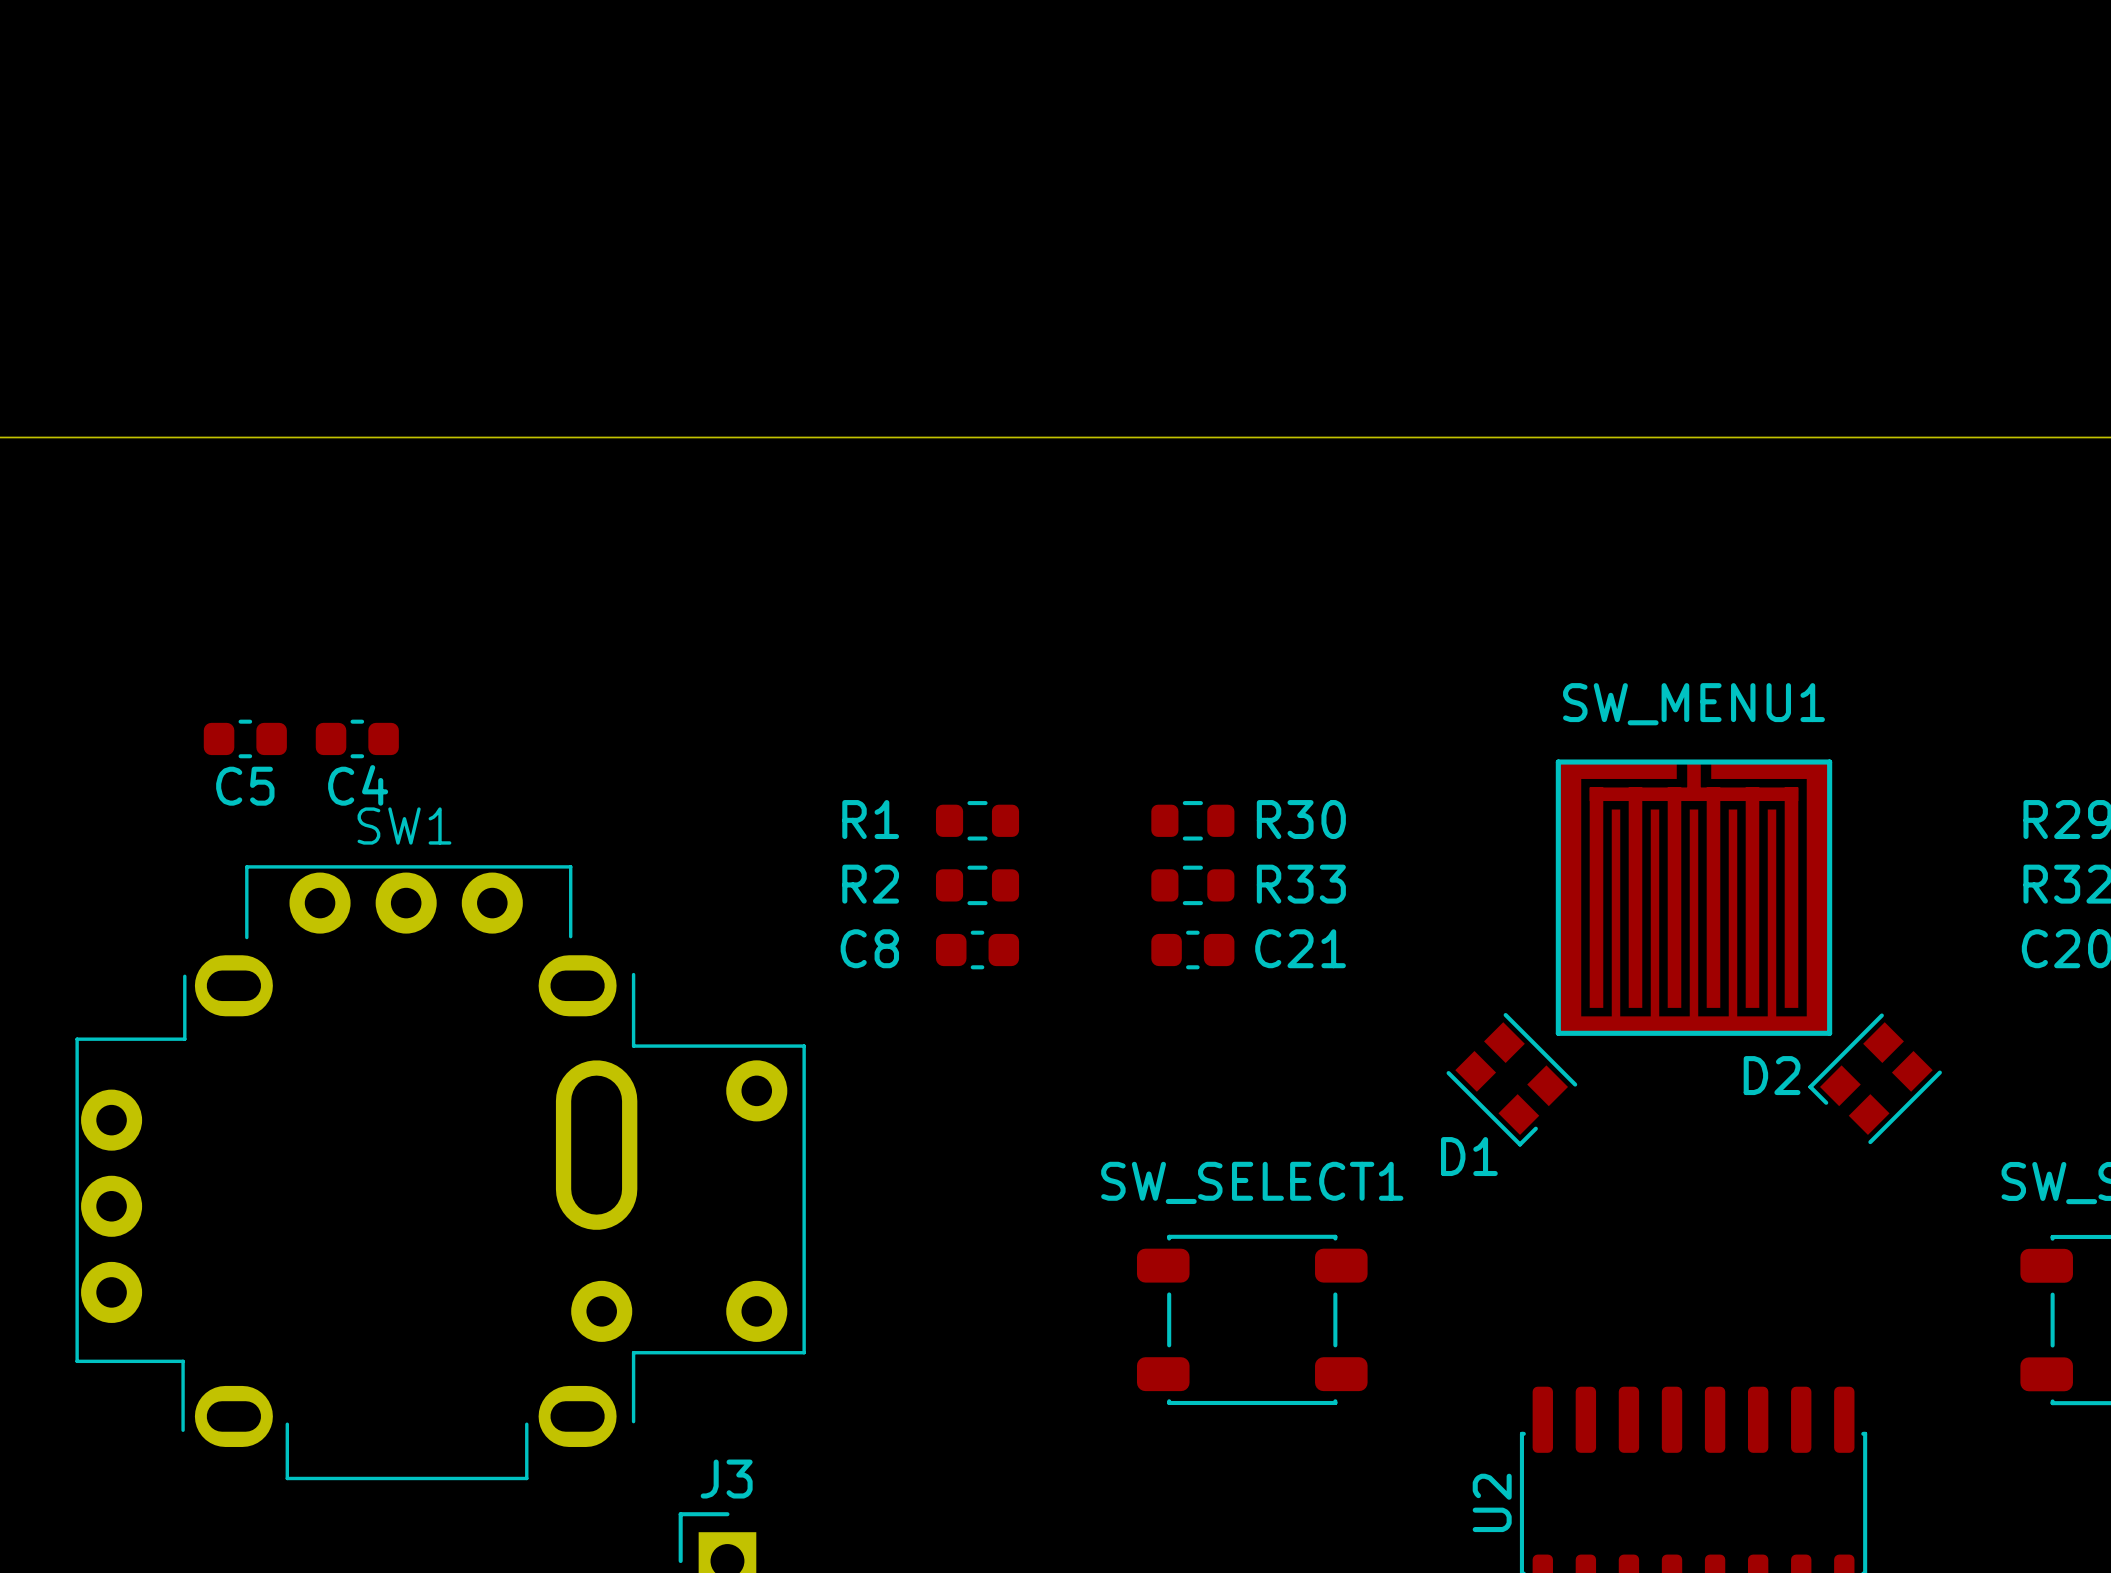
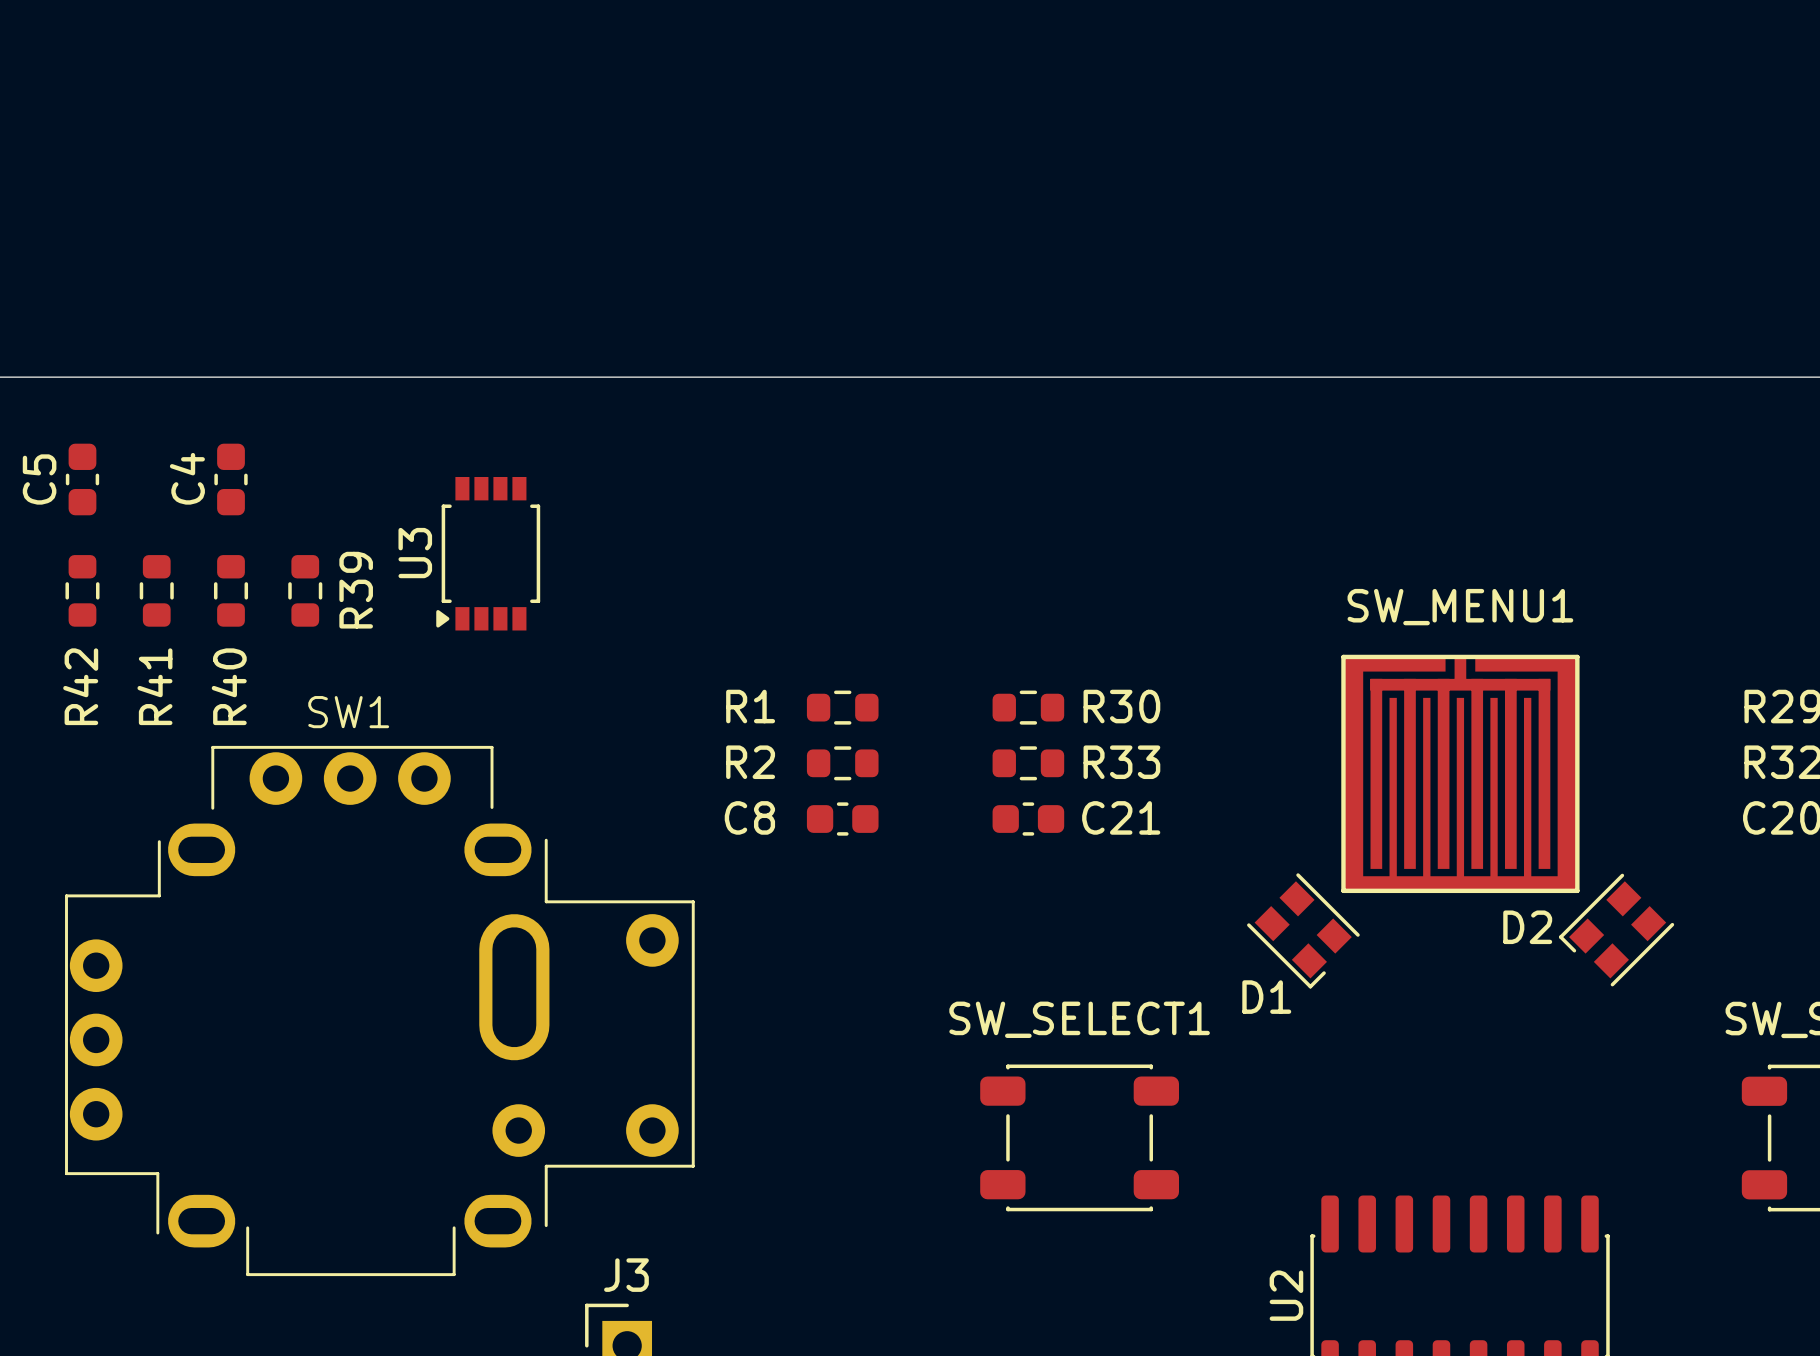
U3: none -> (488, 553)
R42: none -> (82, 590)
R41: none -> (156, 590)
R40: none -> (231, 590)
R39: none -> (305, 590)
C5 rotation: 0° (245, 738) -> 90° clockwise (82, 479)
C5 position: (245, 738) -> (82, 479)
C4 rotation: 0° (357, 738) -> 90° clockwise (231, 479)
C4 position: (357, 738) -> (231, 479)

